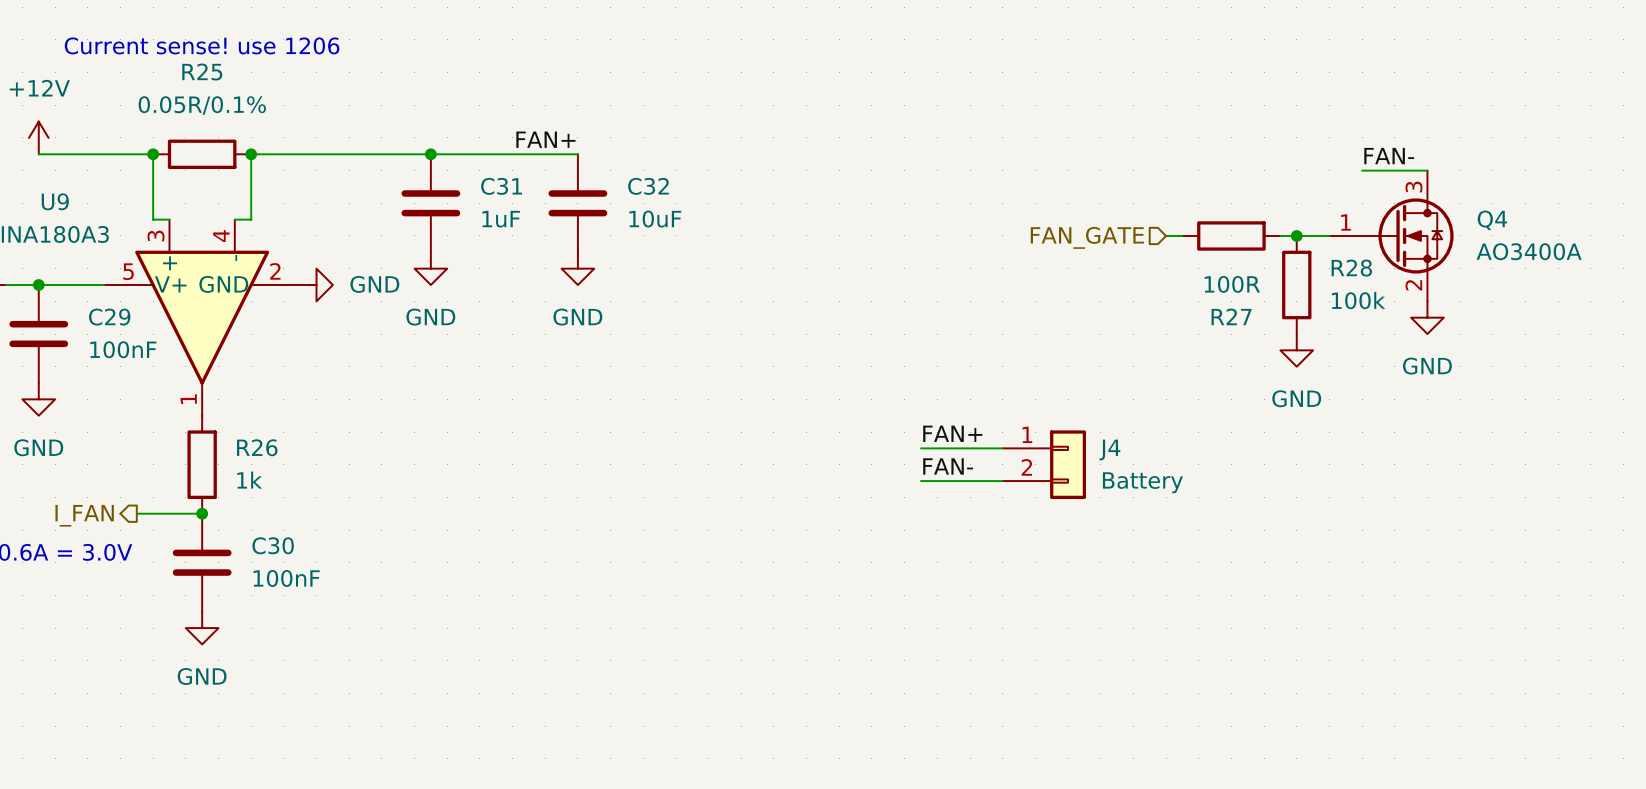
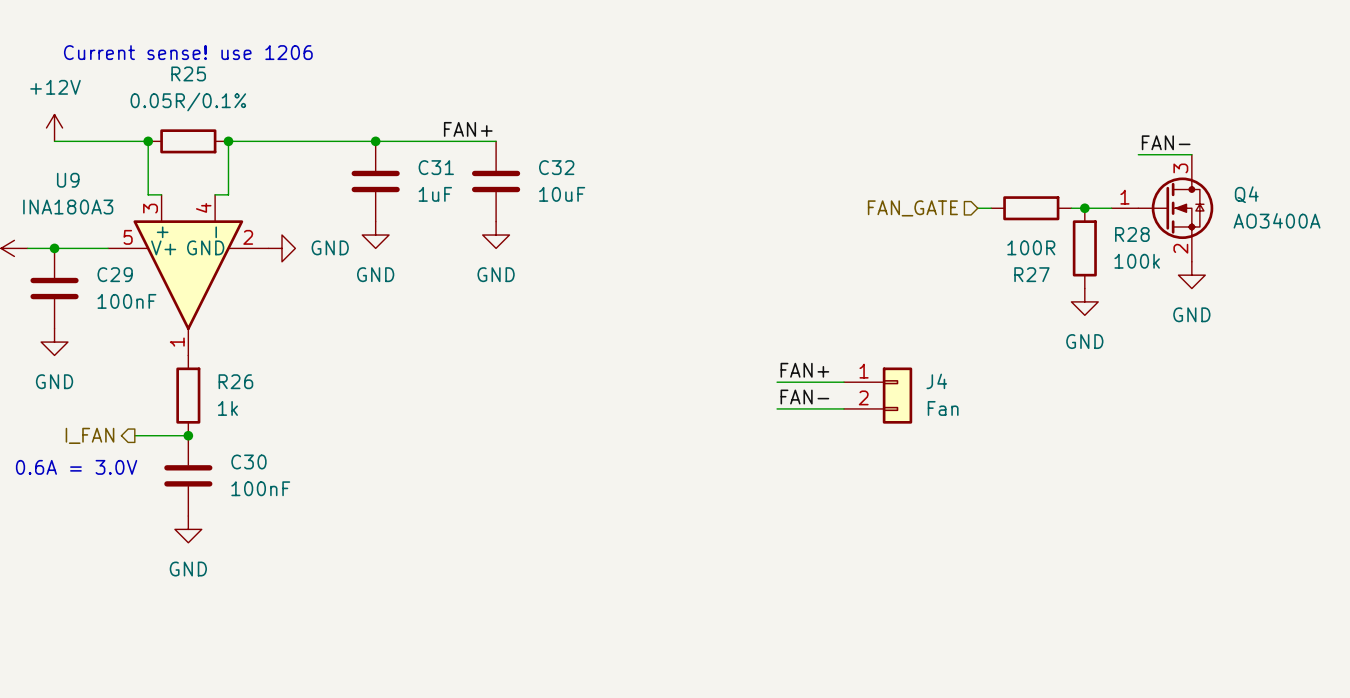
J4 value: Battery (1142, 482) -> Fan (943, 408)

